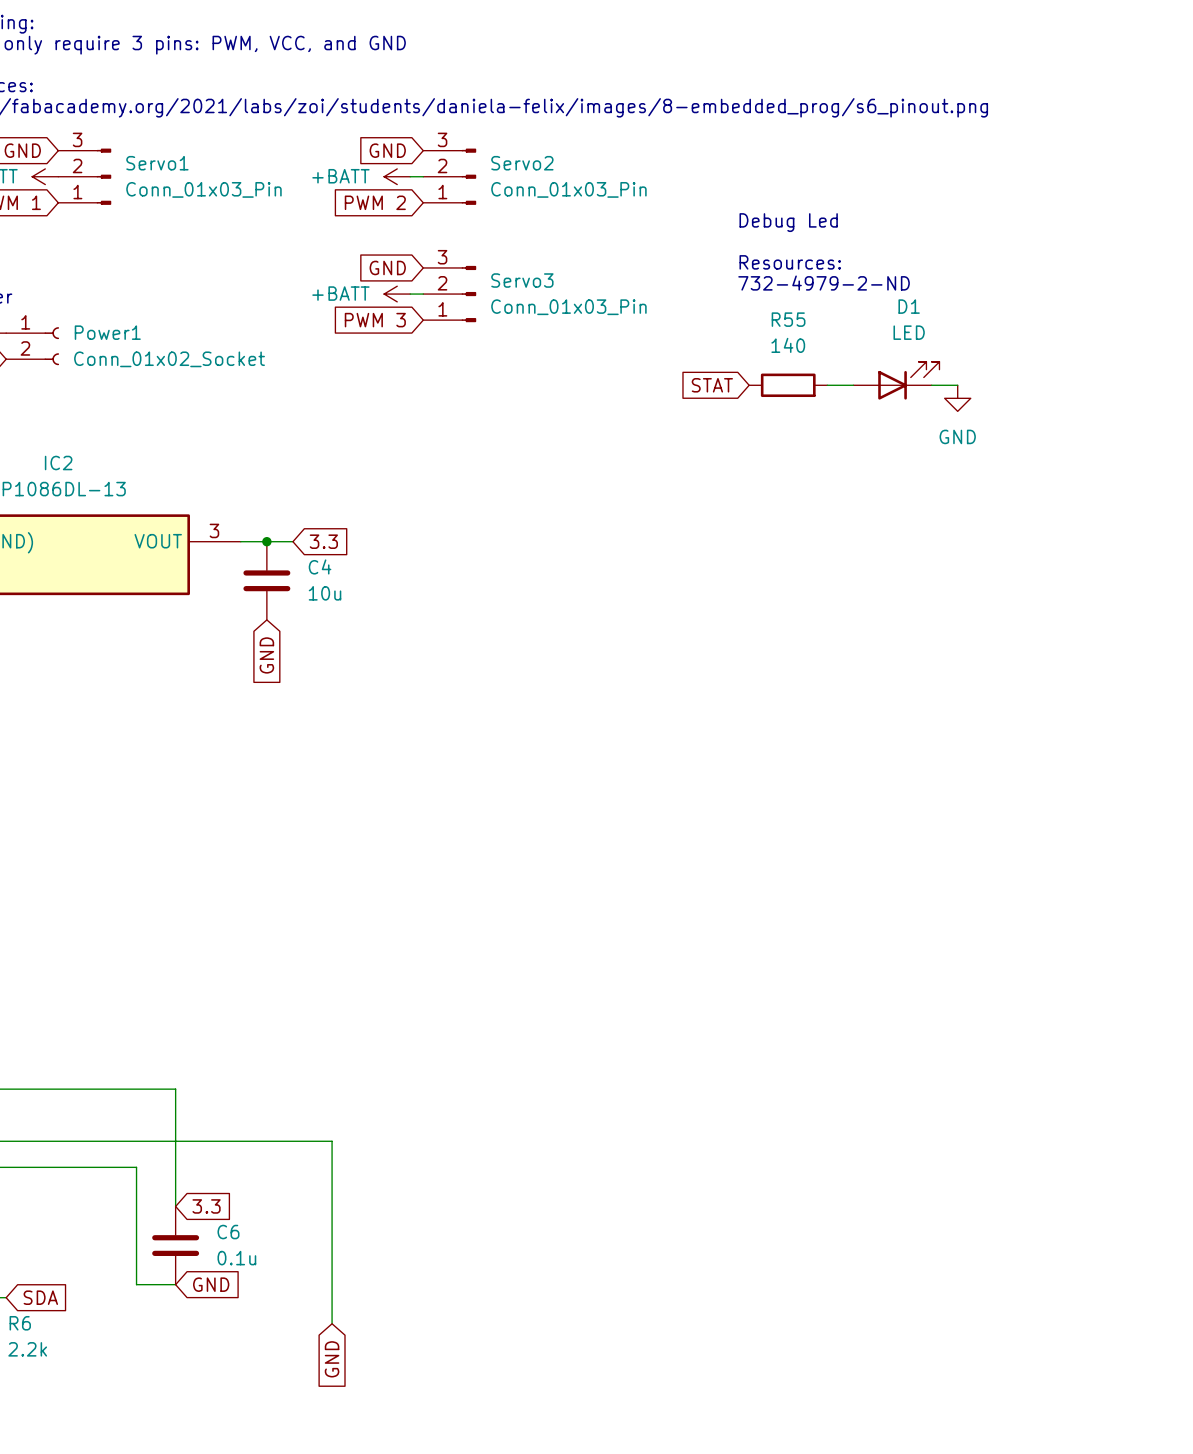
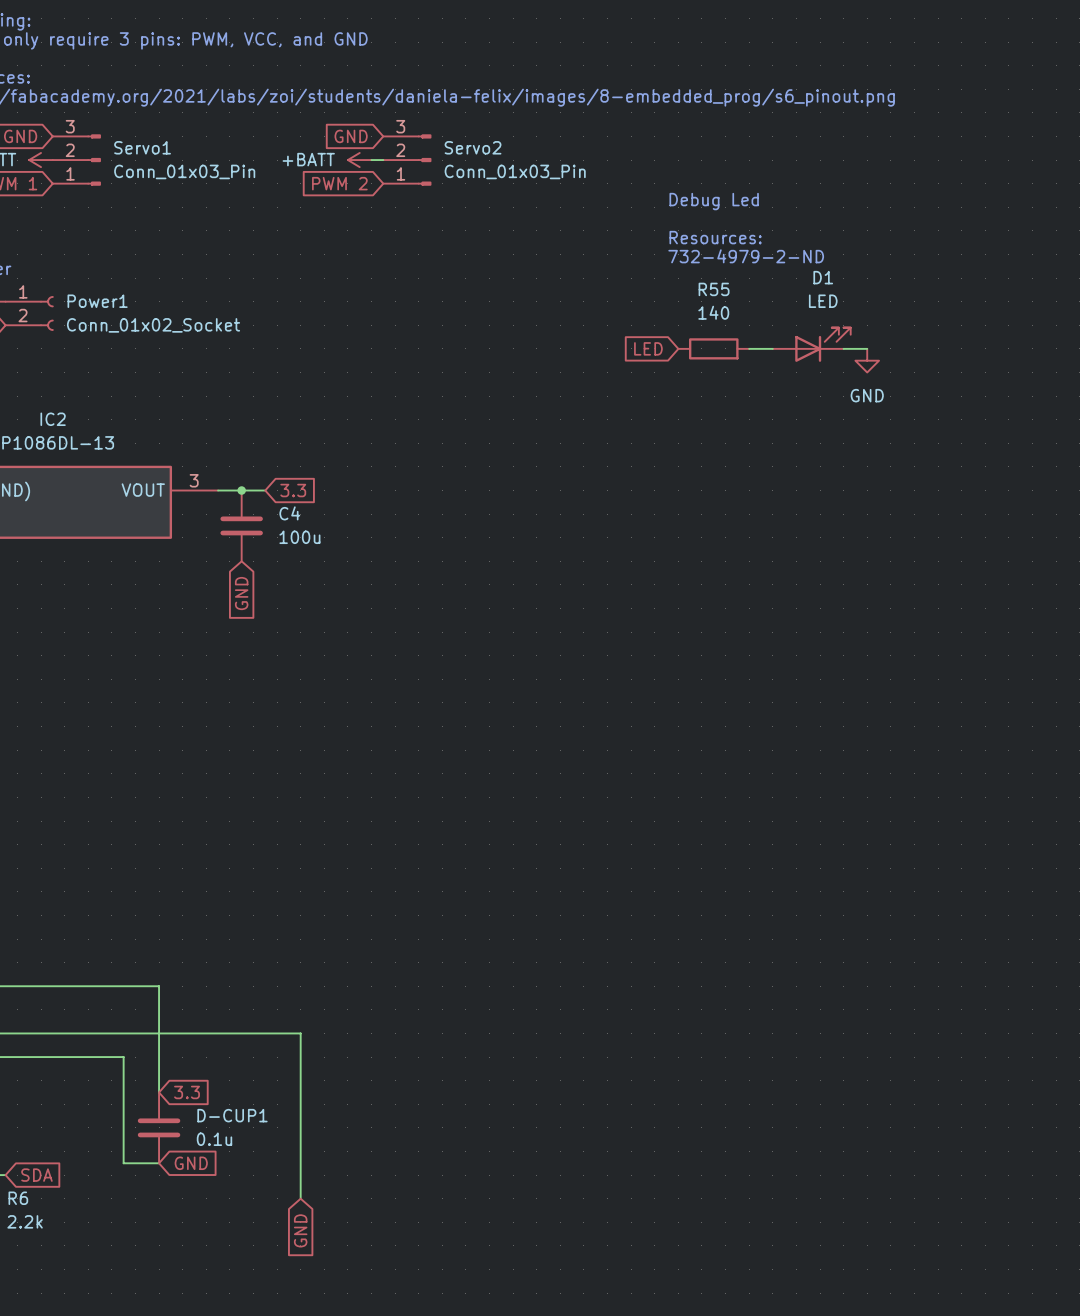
global label: GND (387, 267) -> none
power symbol: +BATT (397, 294) -> none
wire: (410, 294) (423, 294) -> none
Servo3: Conn_01x03_Pin (449, 294) -> none
global label: PWM 3 (375, 320) -> none
global label: STAT (712, 385) -> LED (648, 348)
C4 value: 10u (325, 593) -> 100u (299, 537)
C6 name: C6 (228, 1232) -> D-CUP1 (232, 1115)

